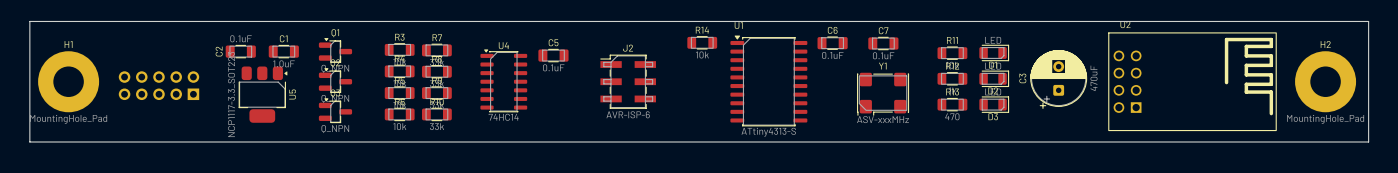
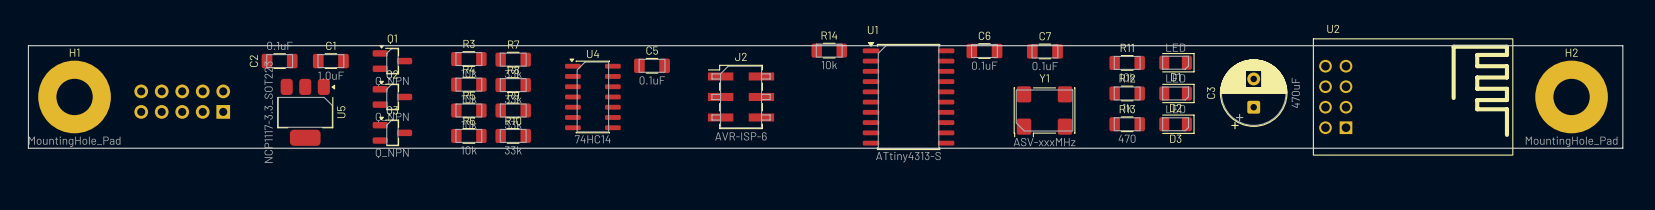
board edge: (29, 38) (29, 21) (1368, 21) (1368, 38) -> (28, 45) (1622, 45)
board edge: (29, 124) (29, 142) (1368, 142) (1368, 124) -> (28, 148) (1622, 148)

